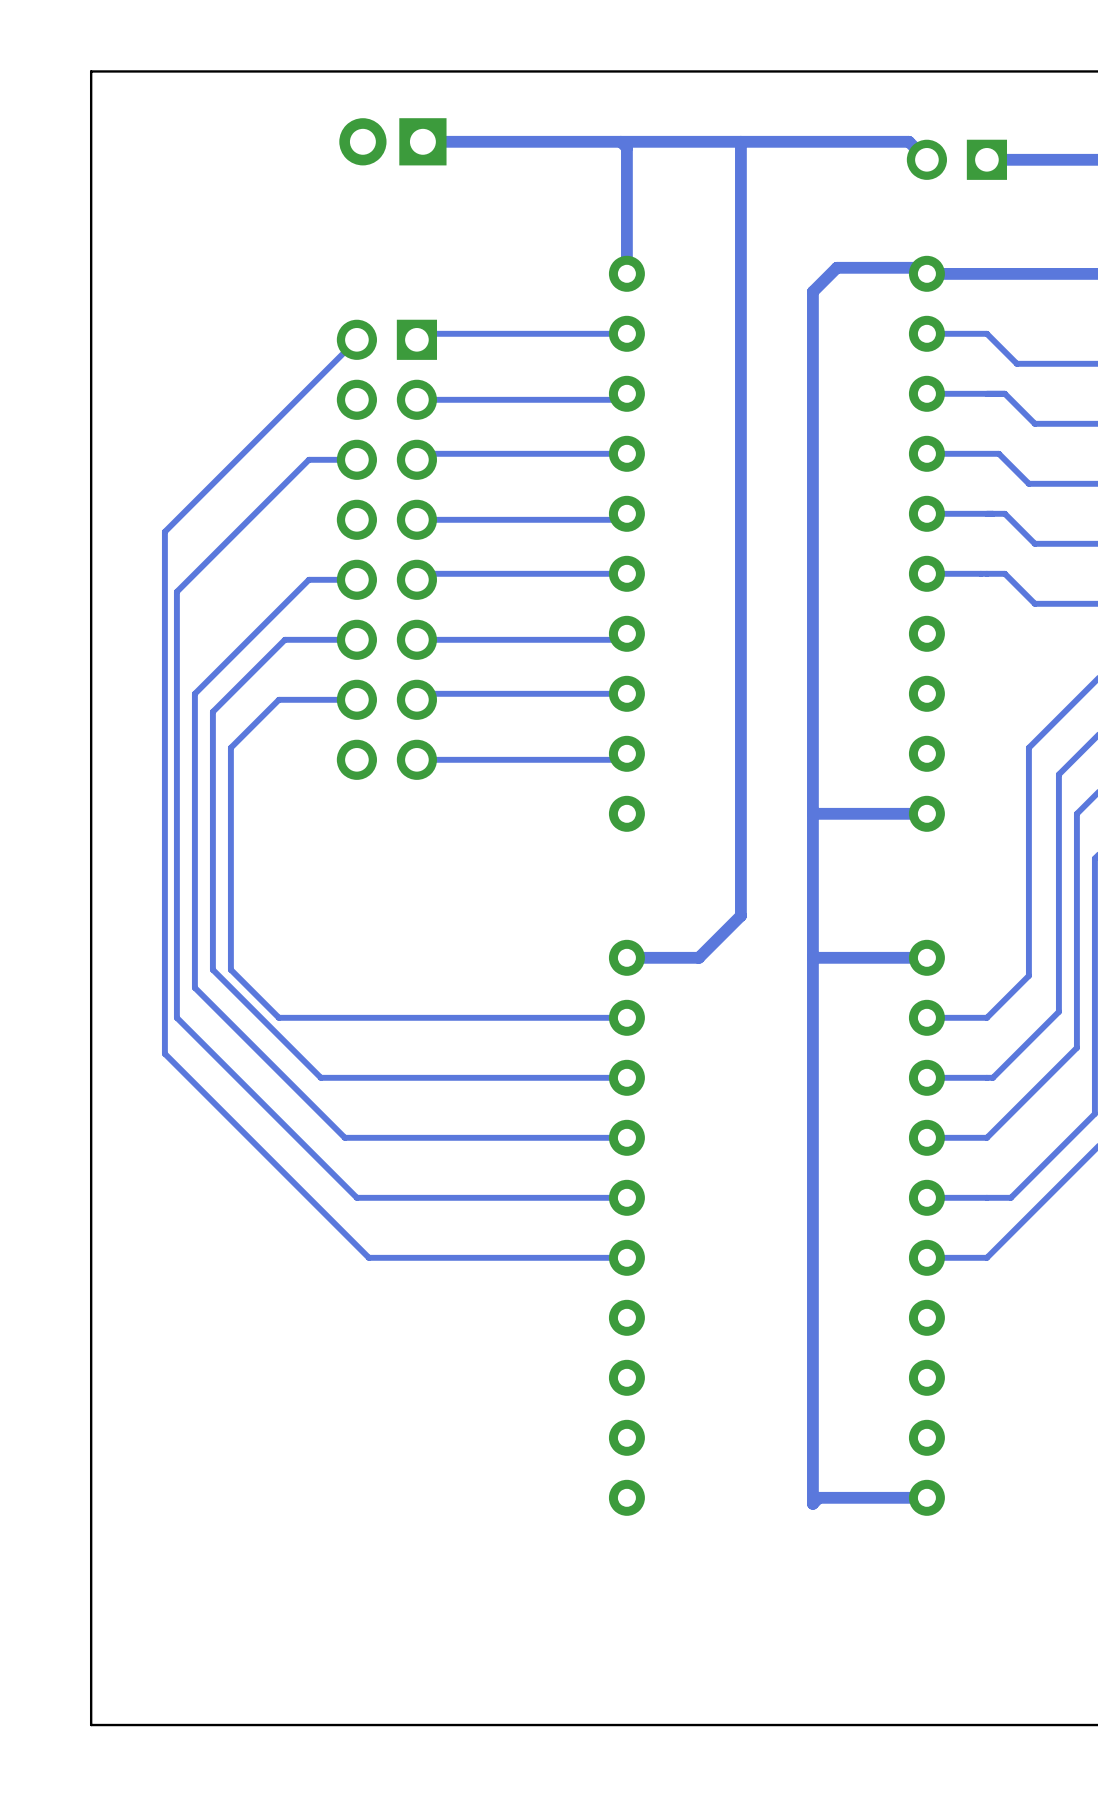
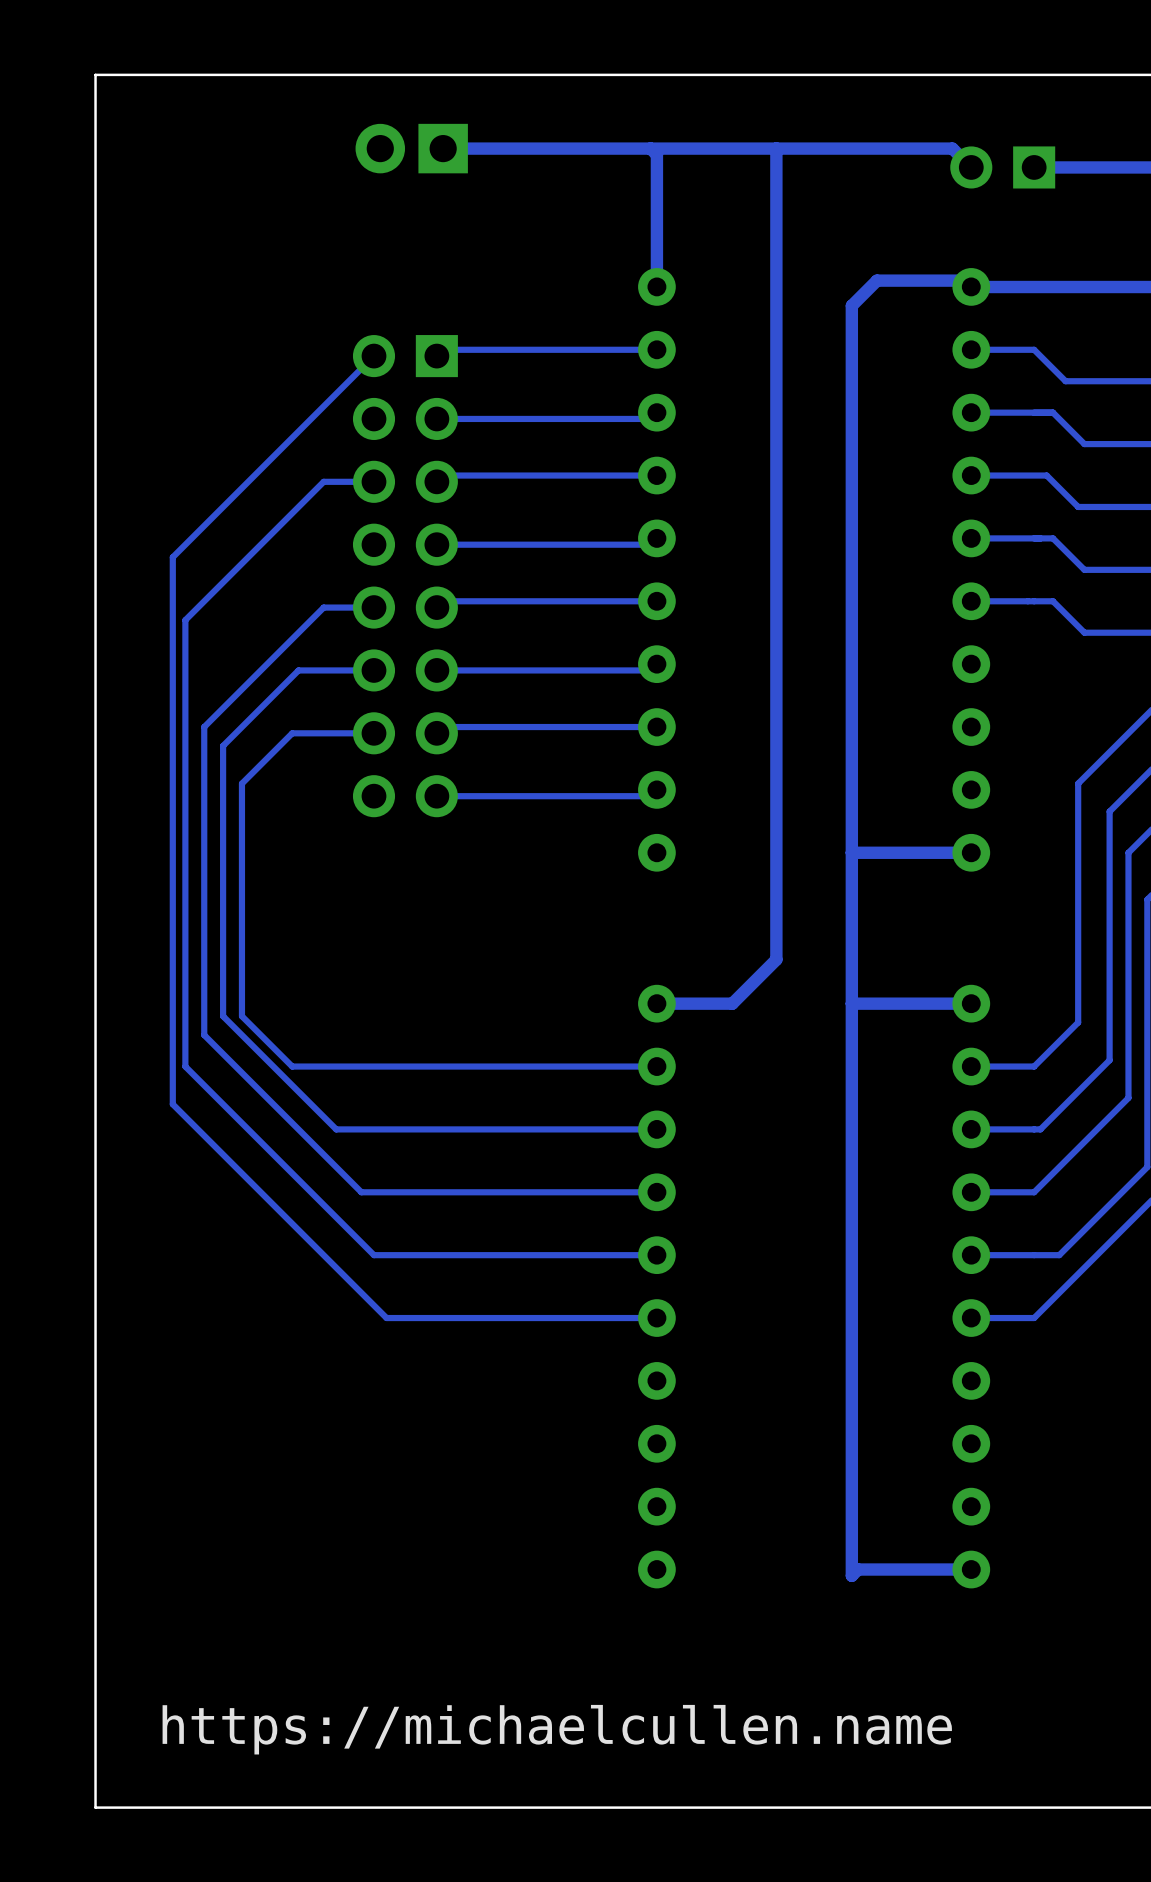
text: none -> https://michaelcullen.name (557, 1729)

